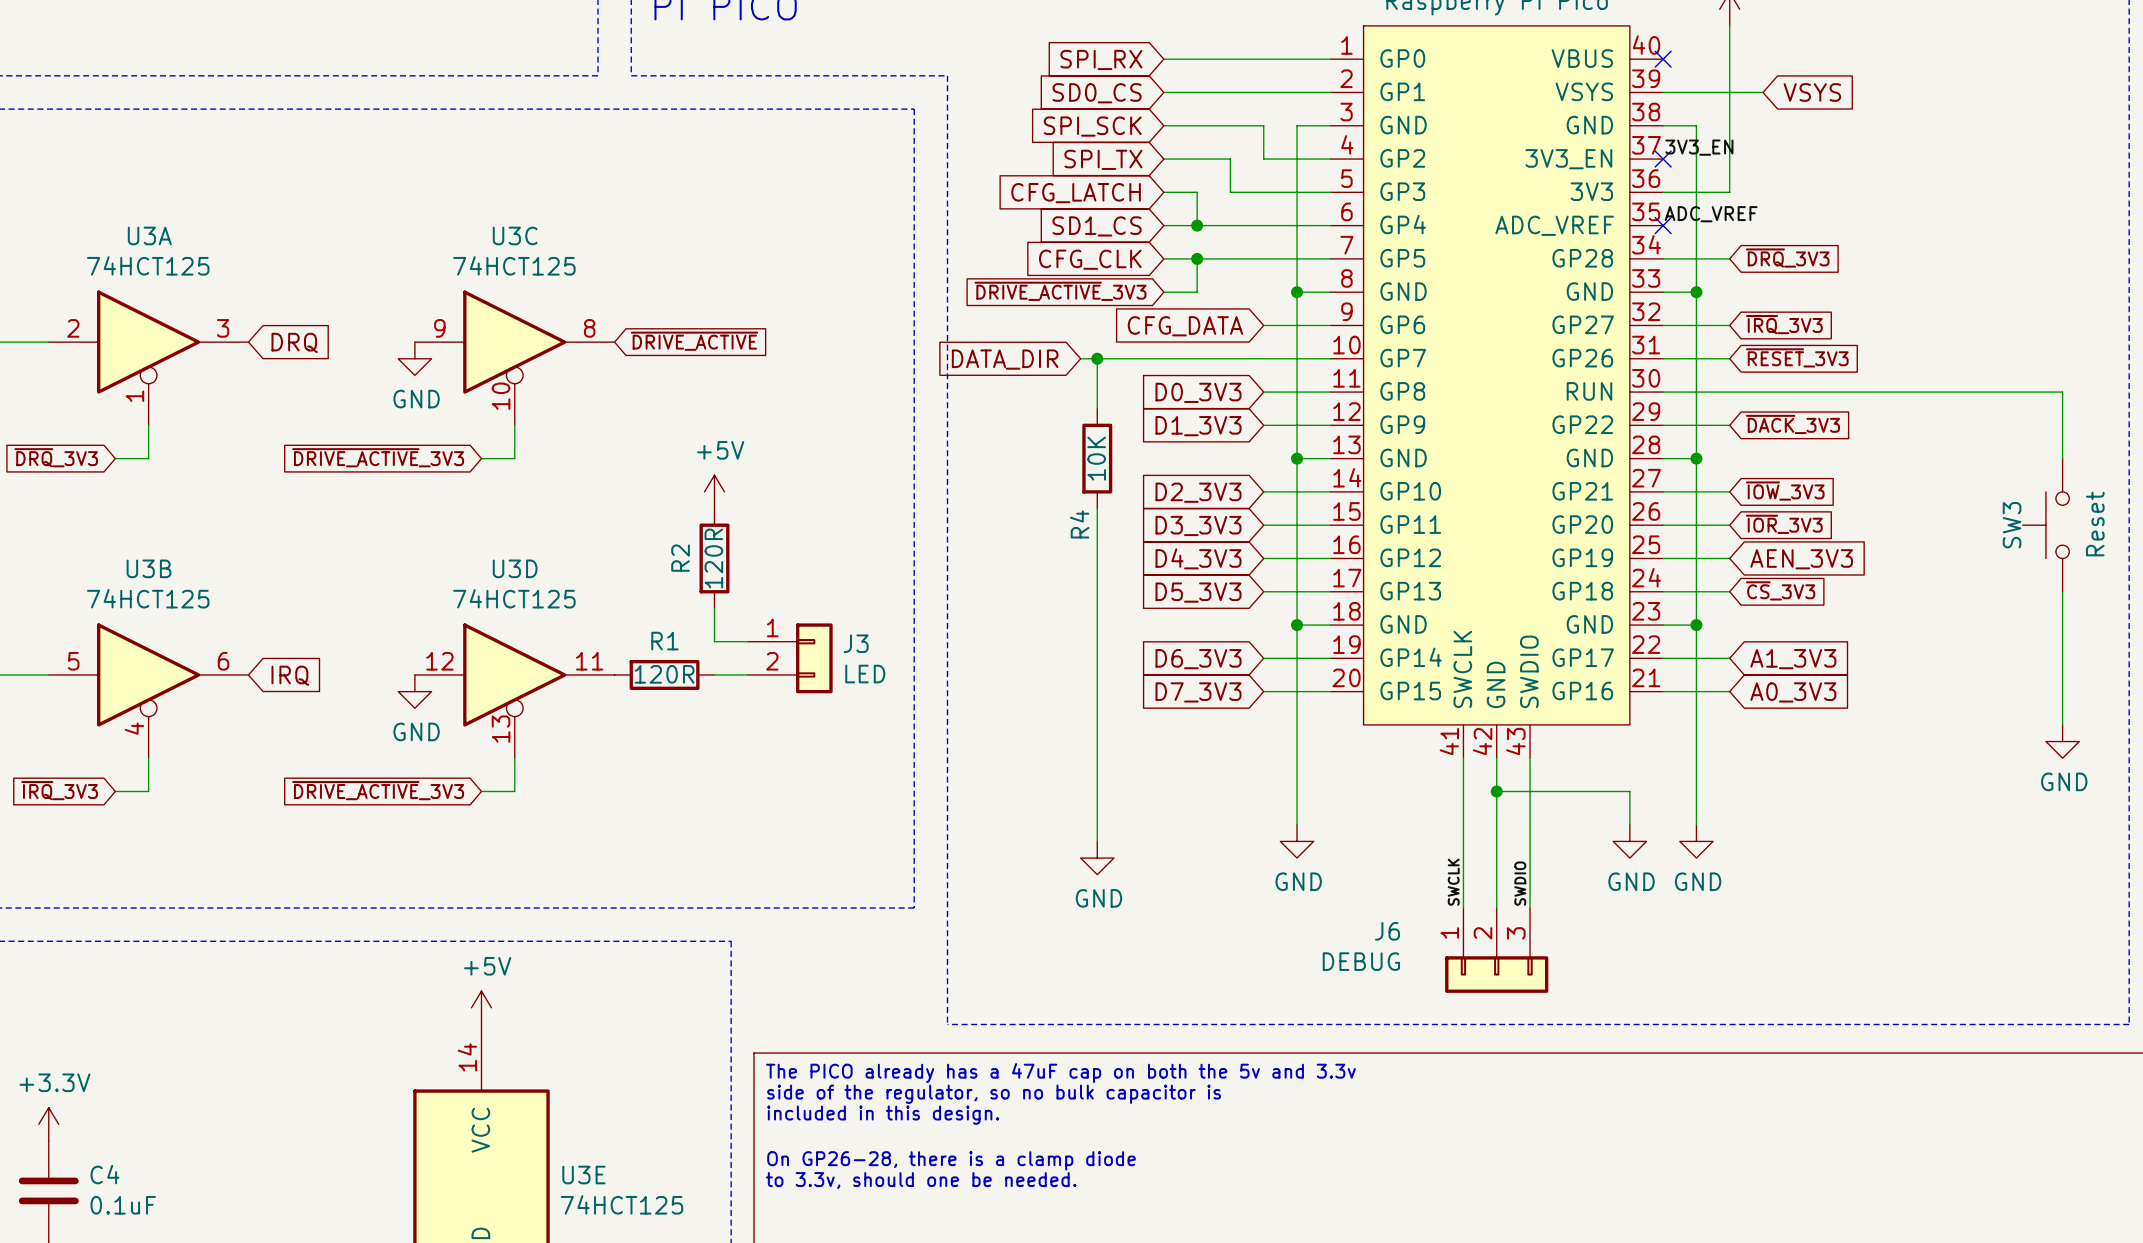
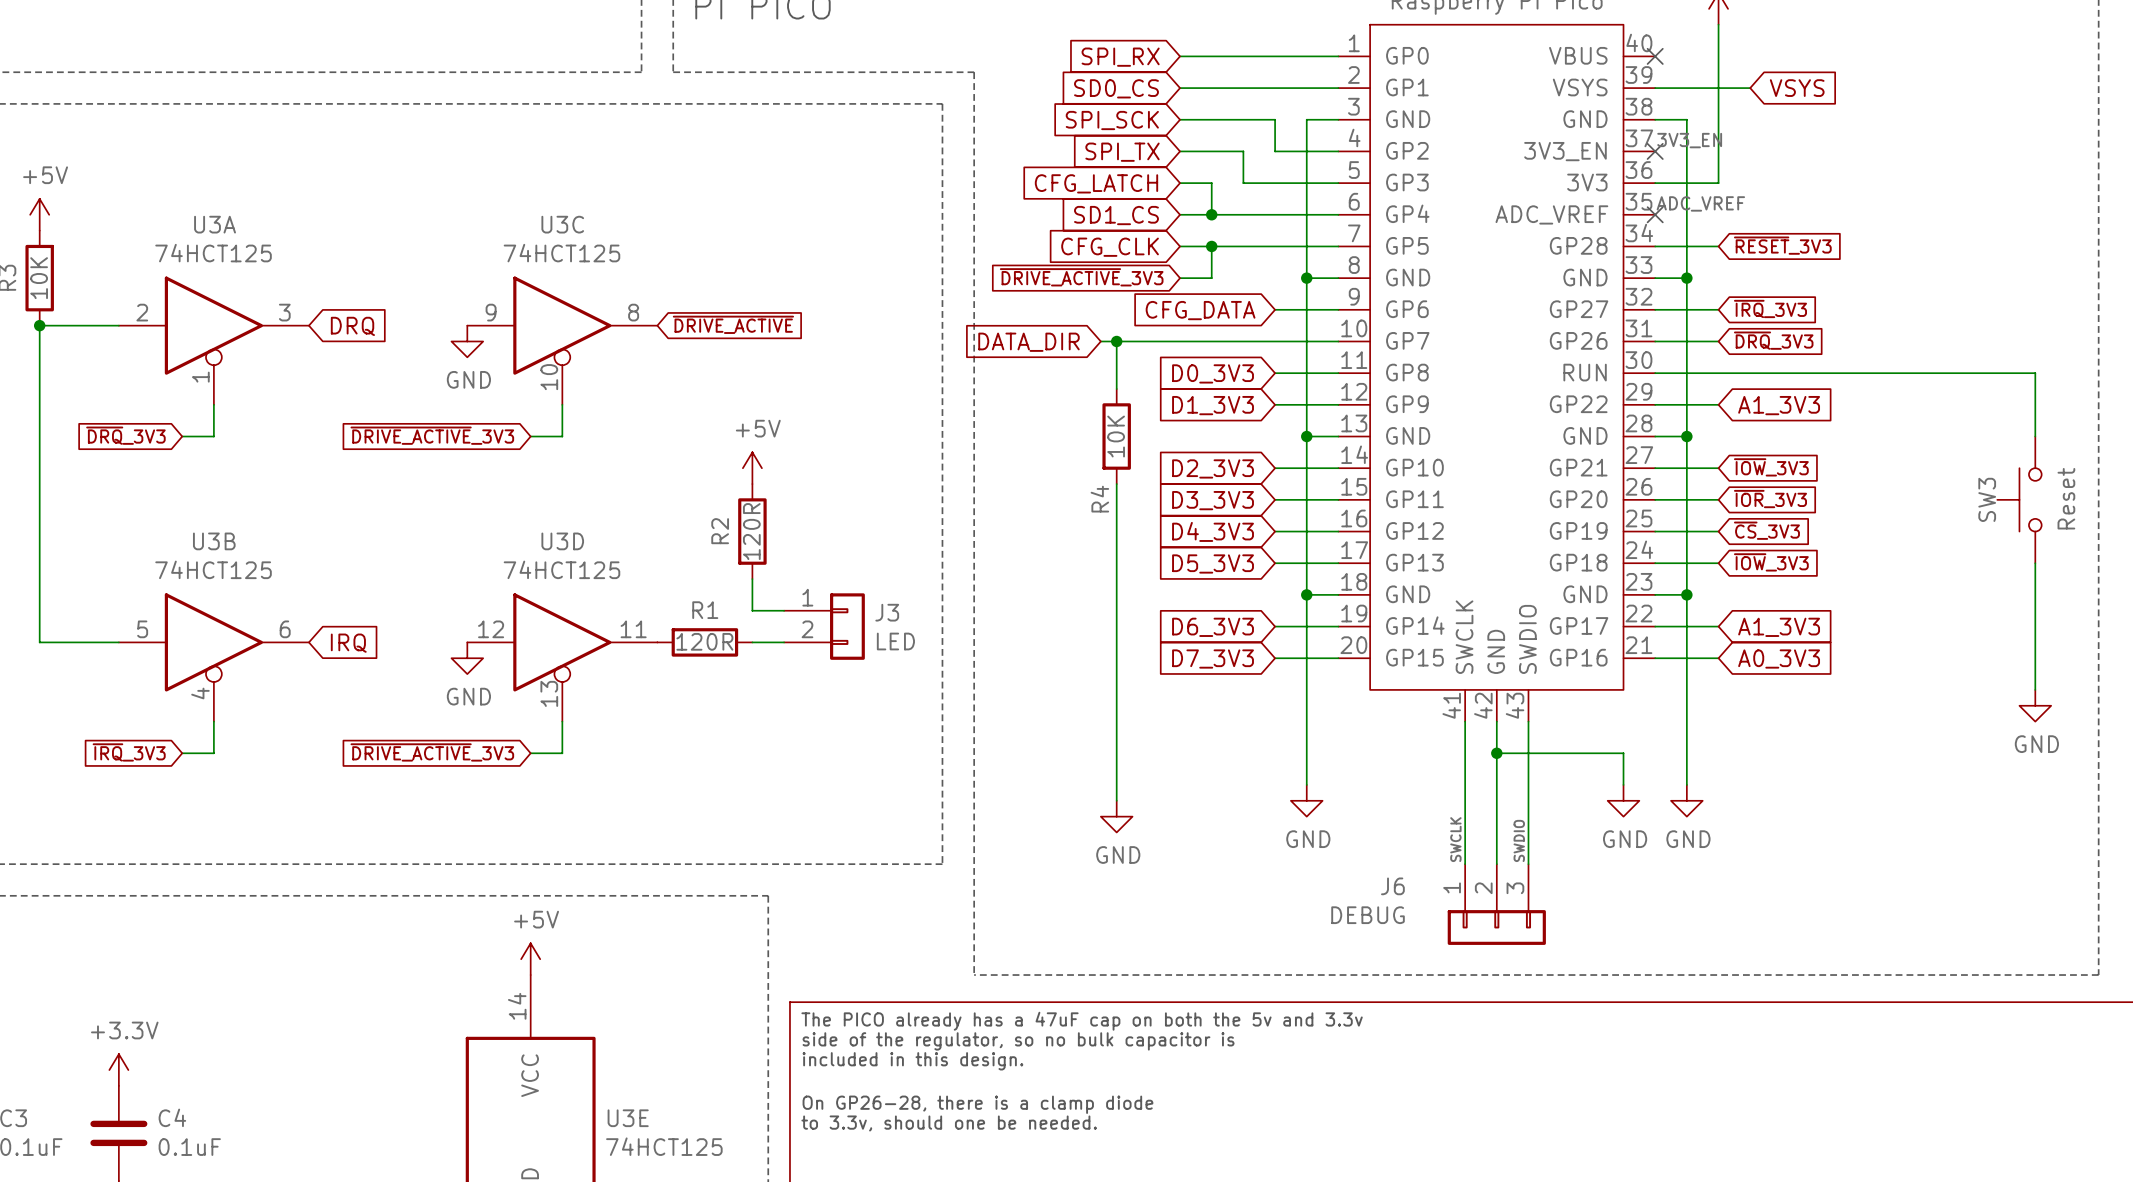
global label: ~{DRQ}_3V3 (1787, 258) -> ~{RESET}_3V3 (1782, 245)
global label: ~{RESET}_3V3 (1797, 357) -> ~{DRQ}_3V3 (1773, 340)
global label: ~{DACK}_3V3 (1792, 424) -> A1_3V3 (1779, 405)
global label: AEN_3V3 (1801, 559) -> ~{CS}_3V3 (1766, 530)
global label: ~{CS}_3V3 (1780, 590) -> ~{IOW}_3V3 (1771, 562)

